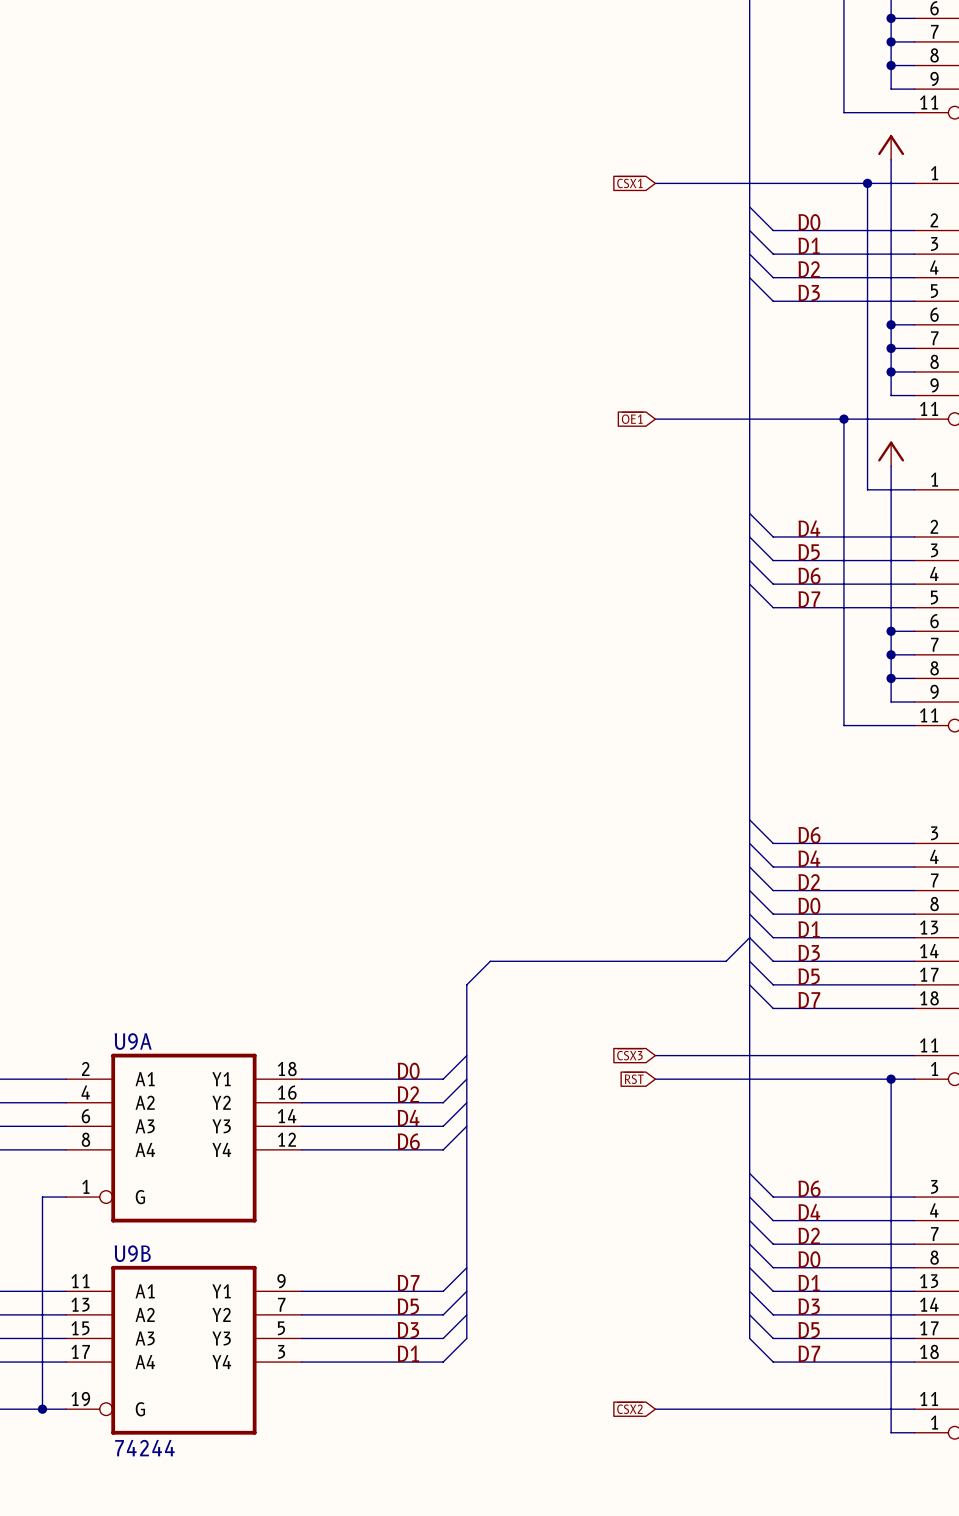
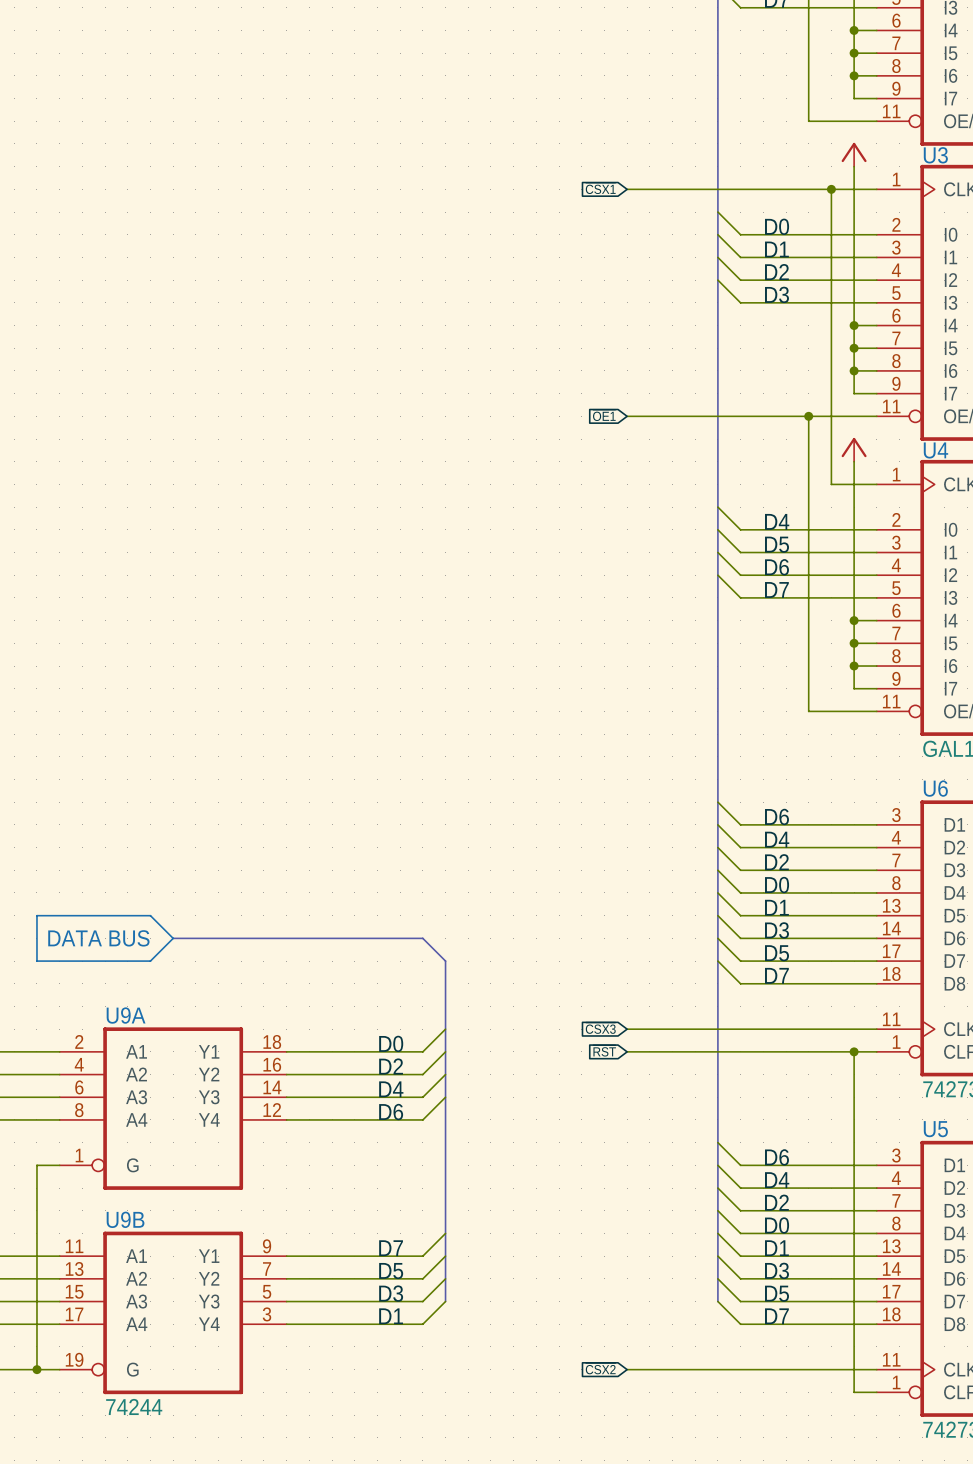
line: none -> (36, 915) (36, 961) (150, 961) (173, 938) (150, 915) (36, 915)
bus: (749, 937) (726, 961) (490, 961) (466, 984) -> (173, 938) (422, 938) (445, 961)
text: none -> DATA BUS (98, 938)

